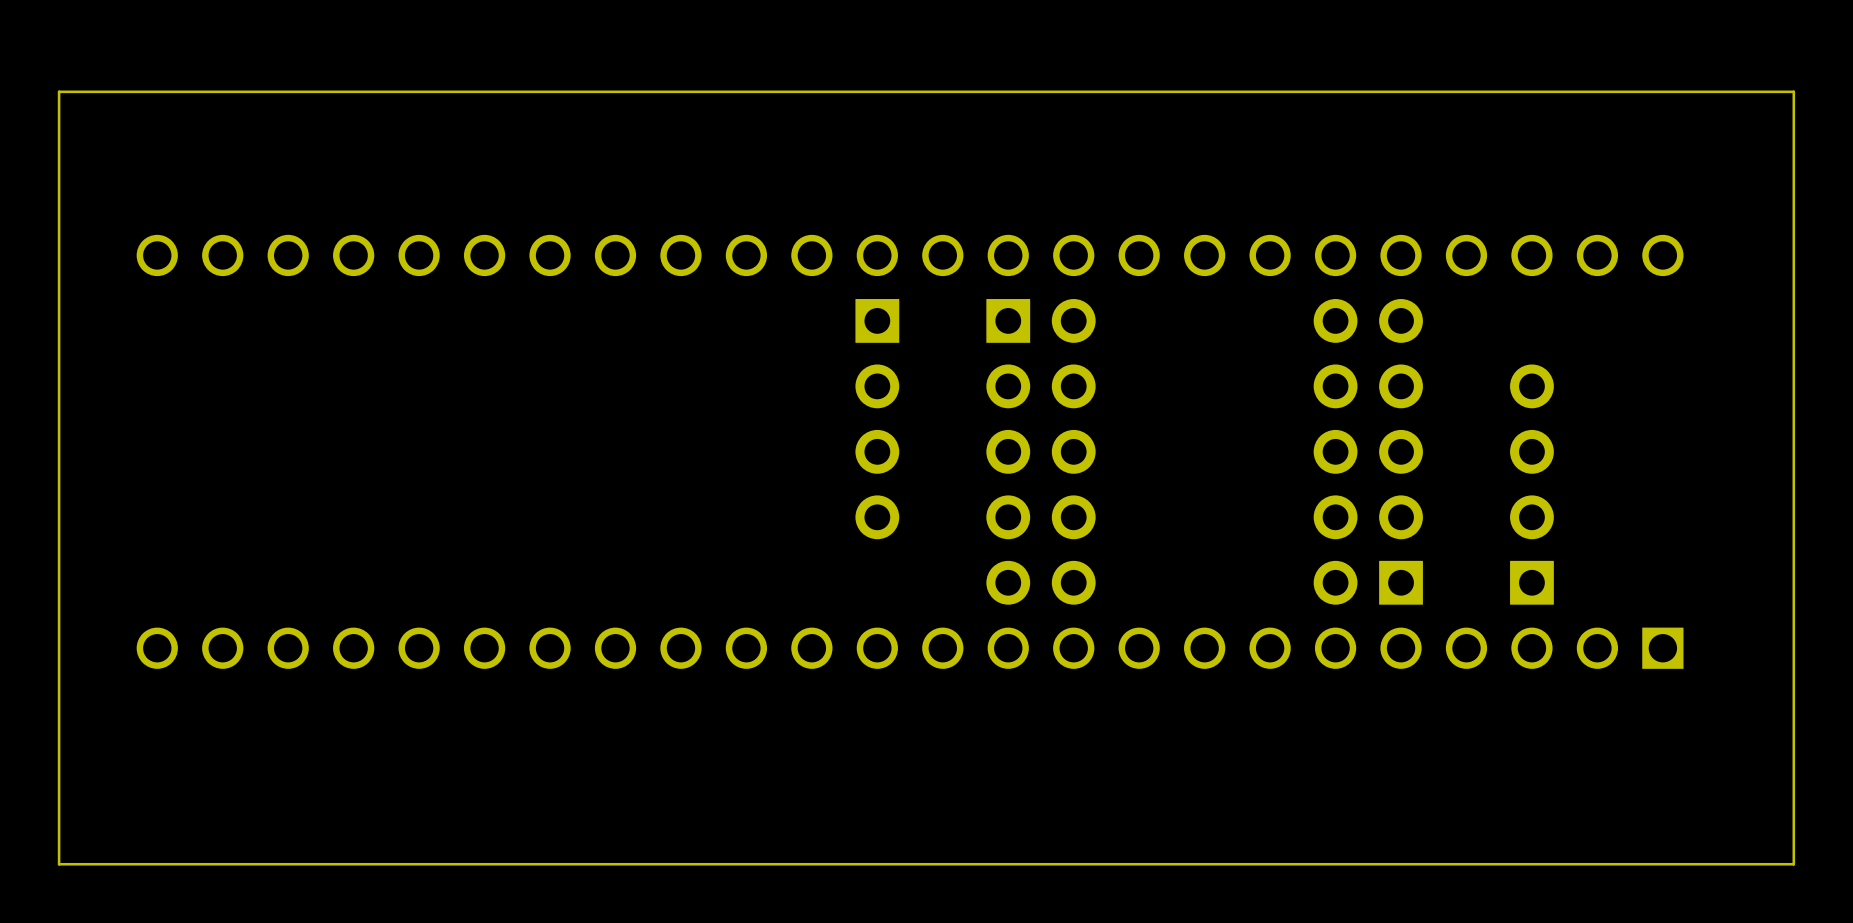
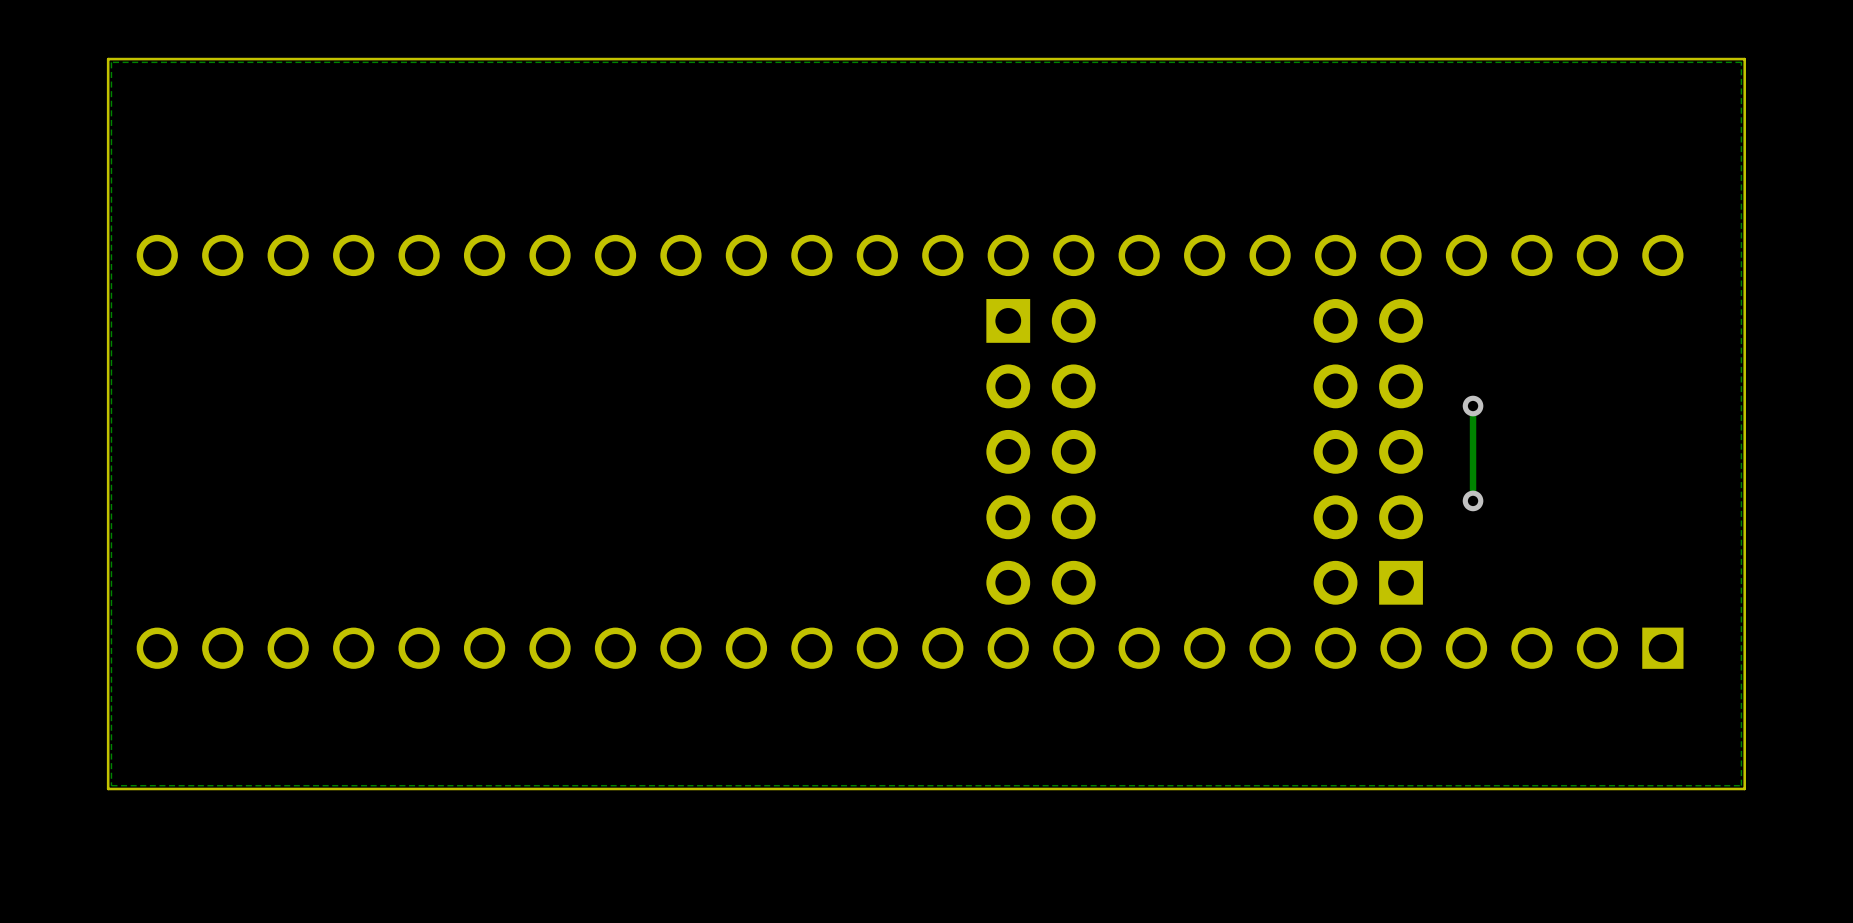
zone outline: none -> (1741, 62) (1741, 785) (111, 785) (111, 62) (1741, 62)
board edge: (1793, 91) (1793, 864) (59, 864) (59, 91) (1793, 91) -> (1744, 59) (1744, 788) (108, 788) (108, 59) (1744, 59)
track: none -> (1473, 406) (1473, 500)
via: none -> (1473, 406)
part: (877, 419) -> none
part: (1531, 484) -> none
via: none -> (1473, 500)

